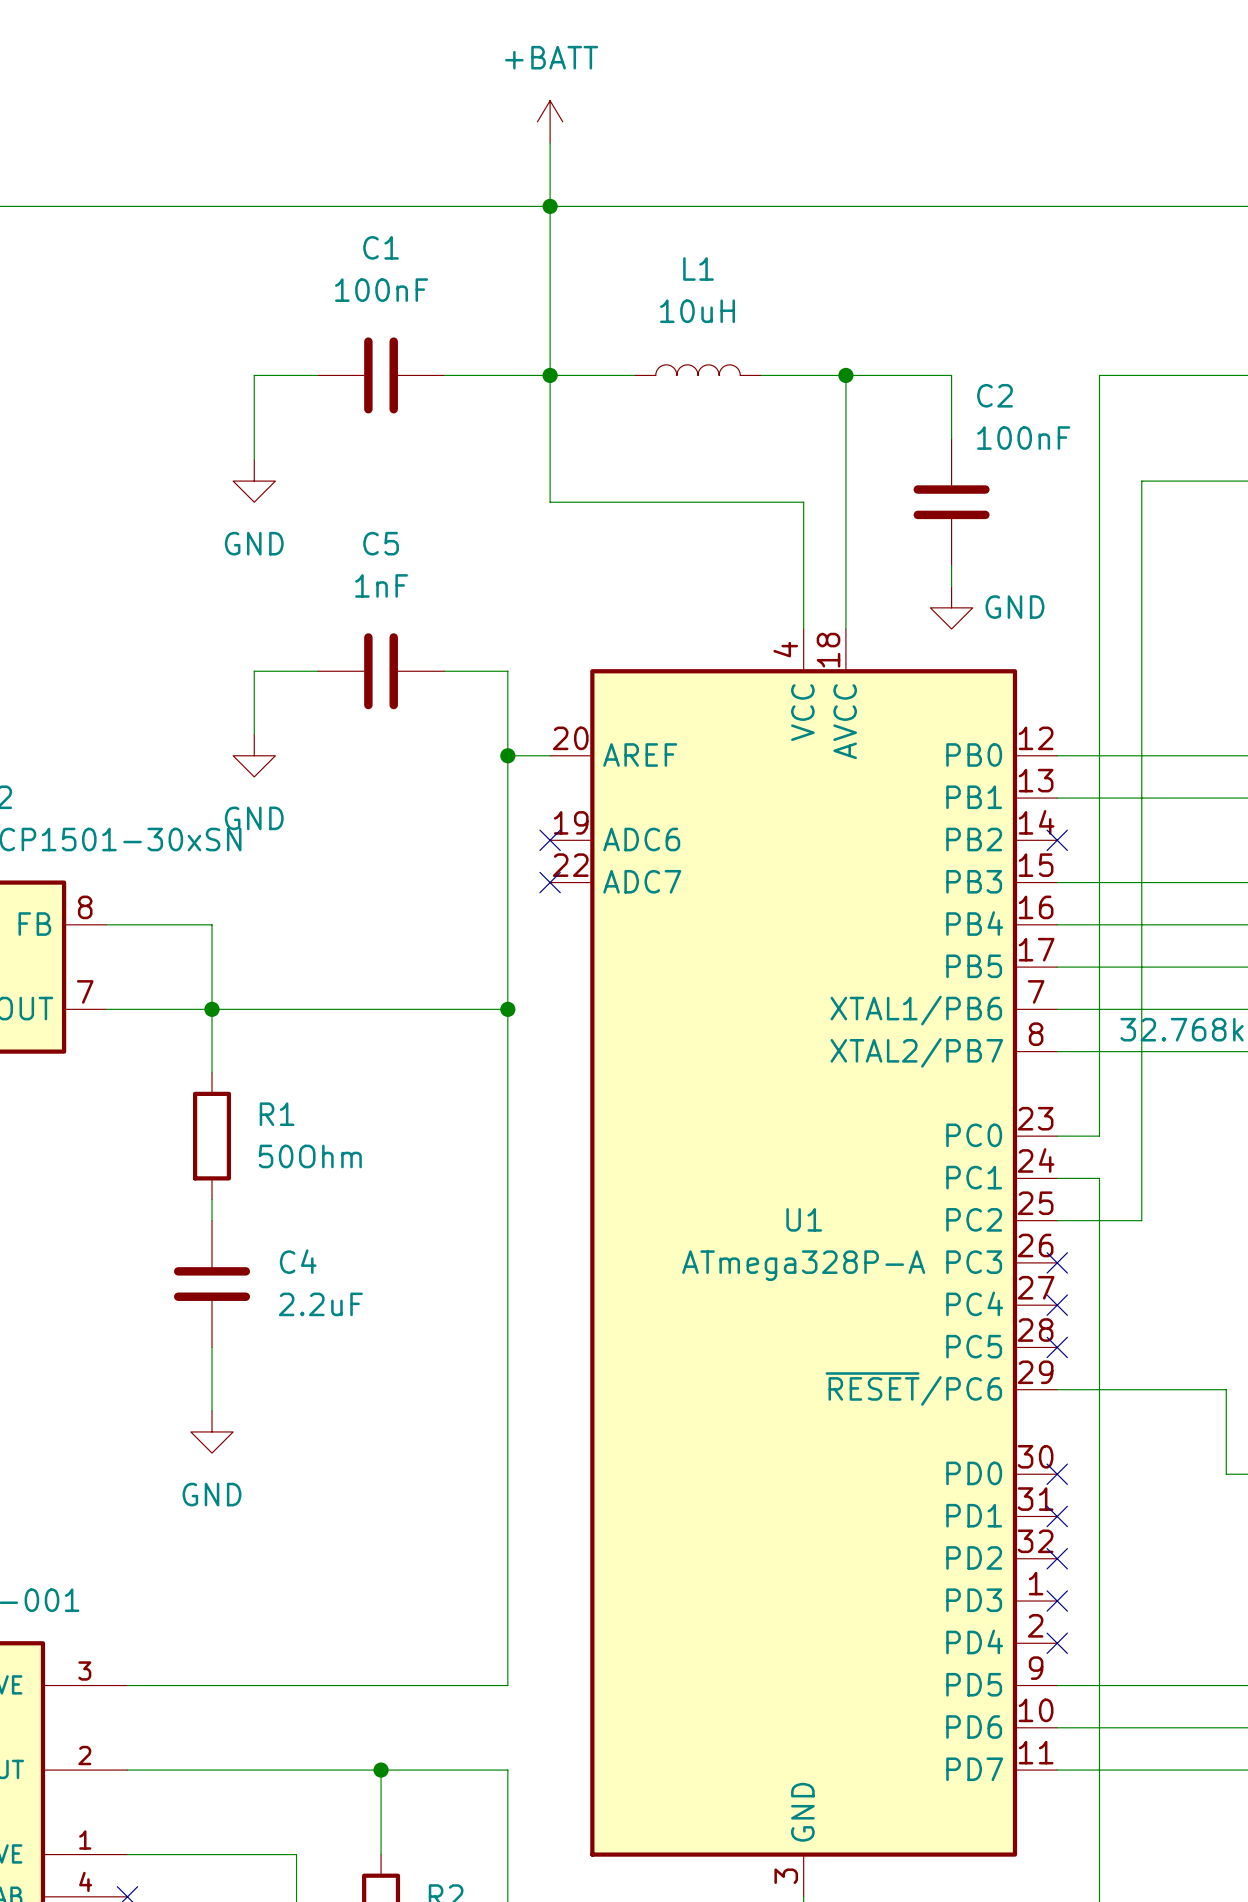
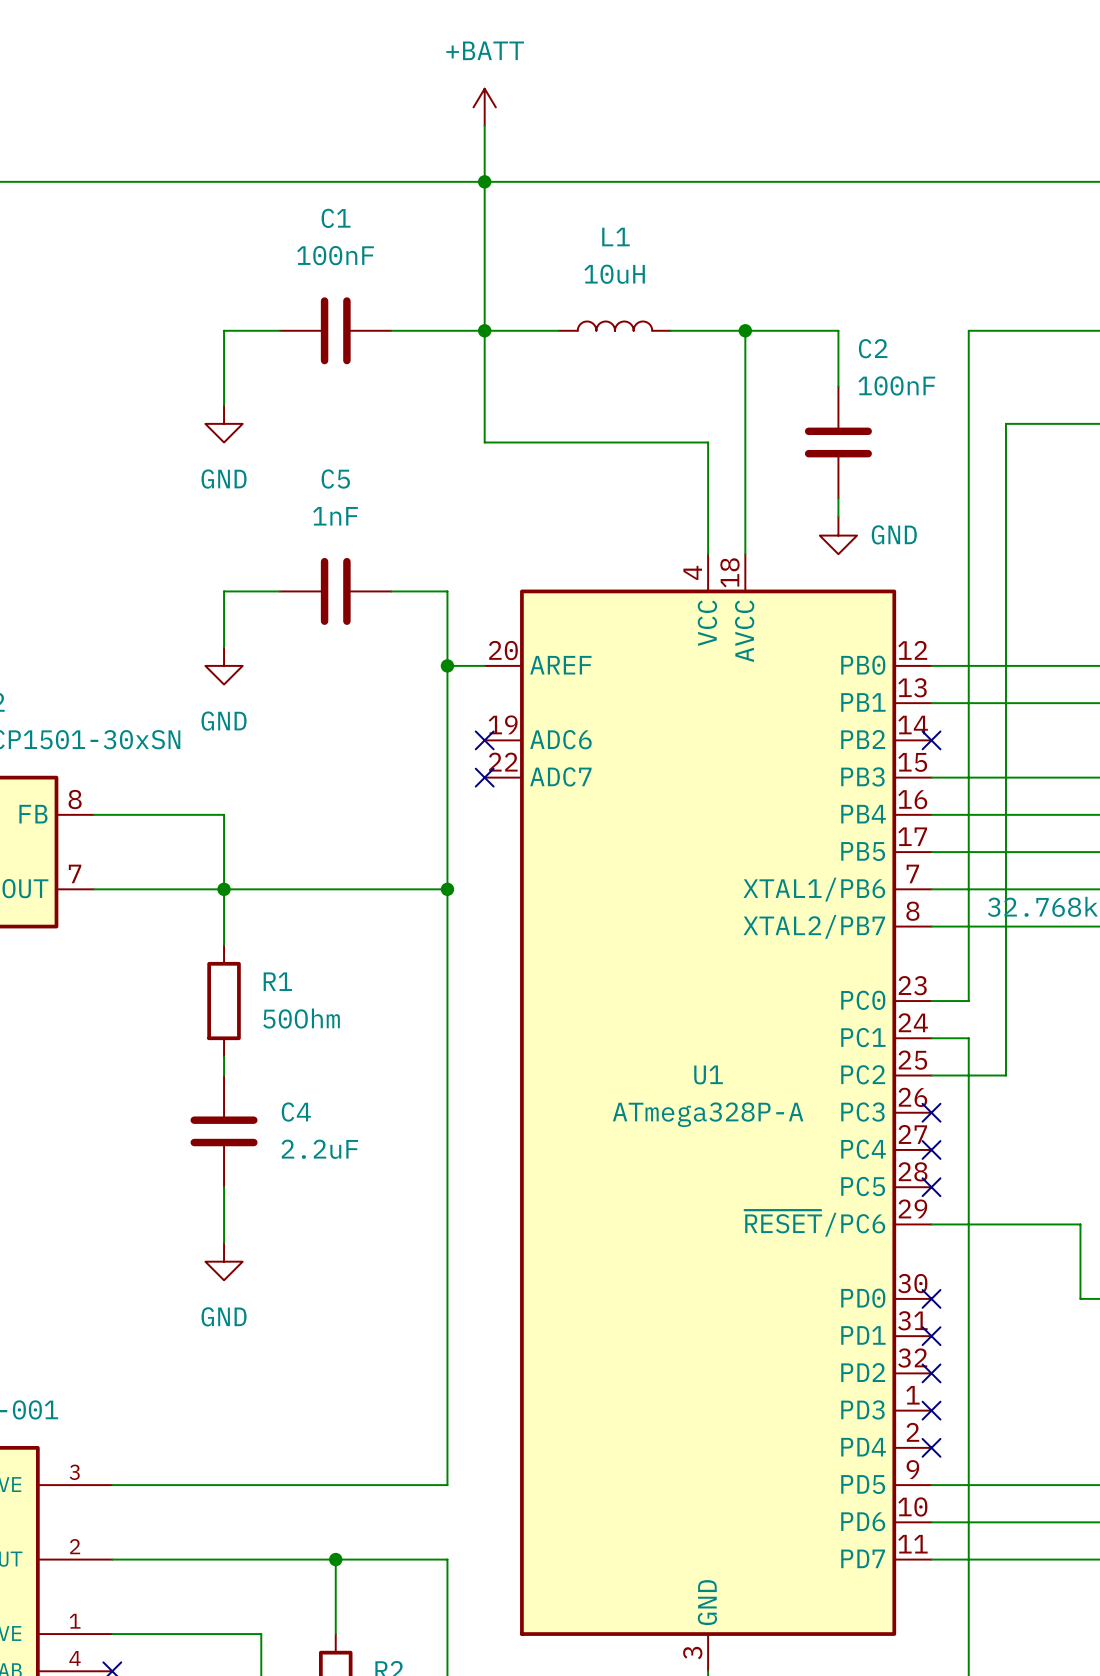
wire: (212, 924) (212, 1072) -> (186, 814) (224, 814) (224, 945)
junction position: (212, 1009) -> (224, 889)
R1 position: (212, 1136) -> (224, 1001)
wire: (212, 1199) (212, 1220) -> (224, 1056) (224, 1075)
C4 position: (212, 1284) -> (224, 1131)
wire: (212, 1347) (212, 1410) -> (224, 1187) (224, 1243)
power symbol position: GND (212, 1431) -> GND (224, 1261)

